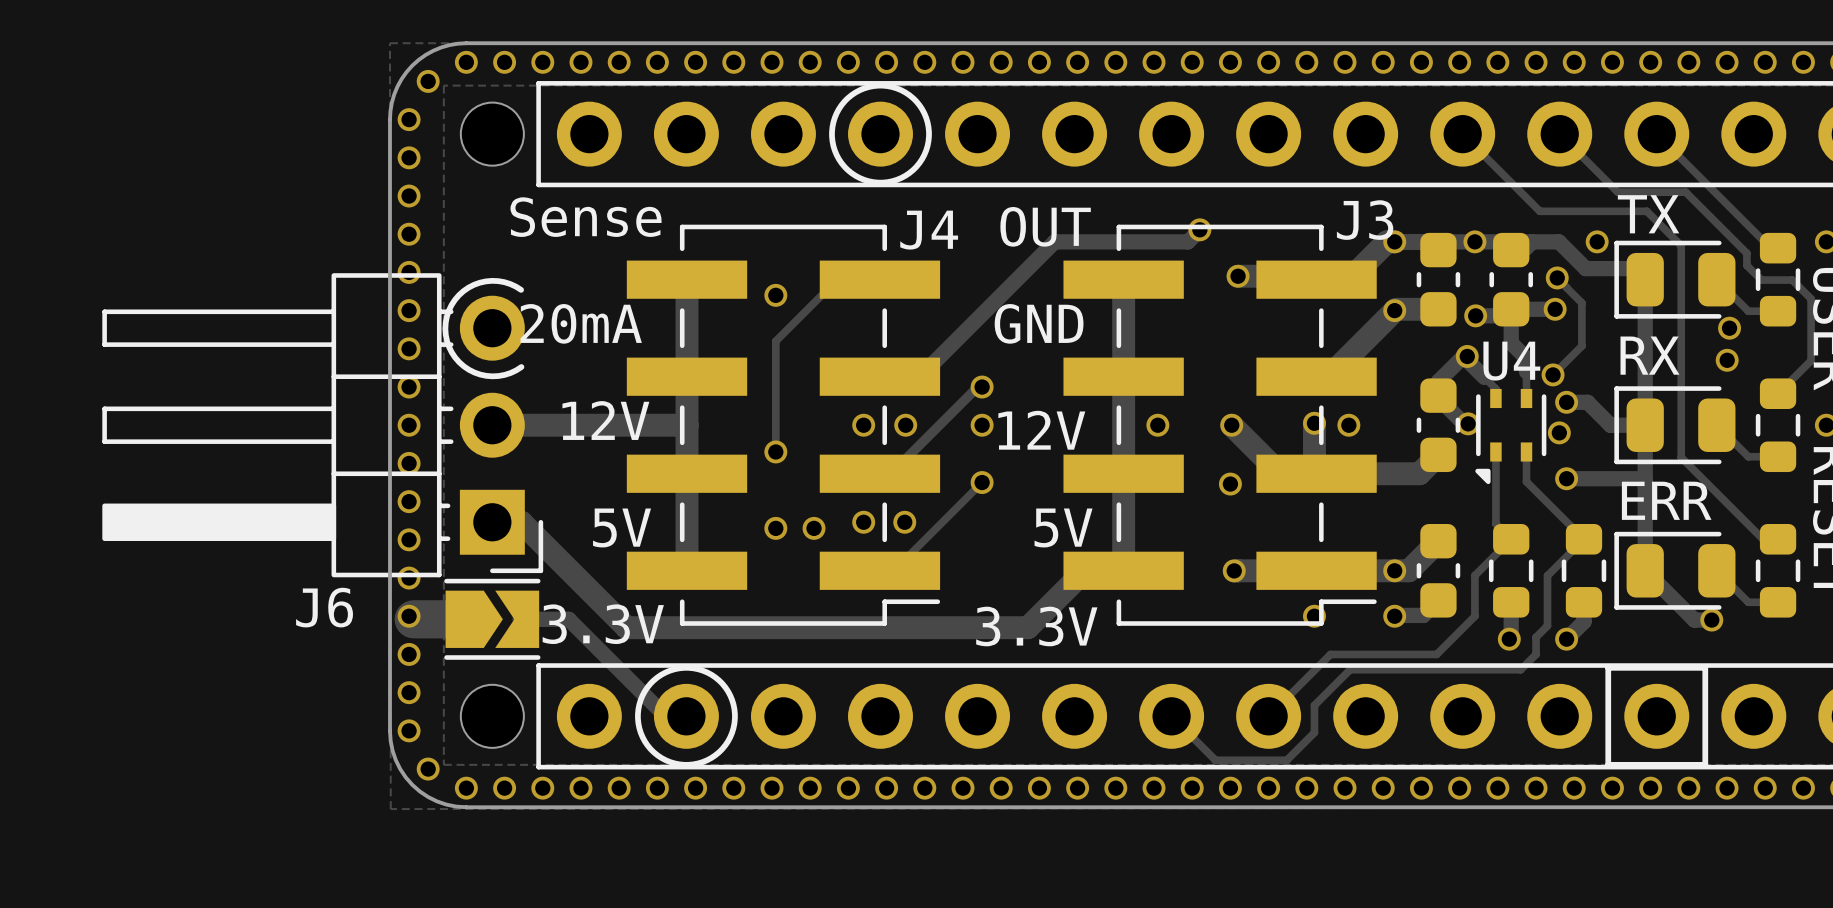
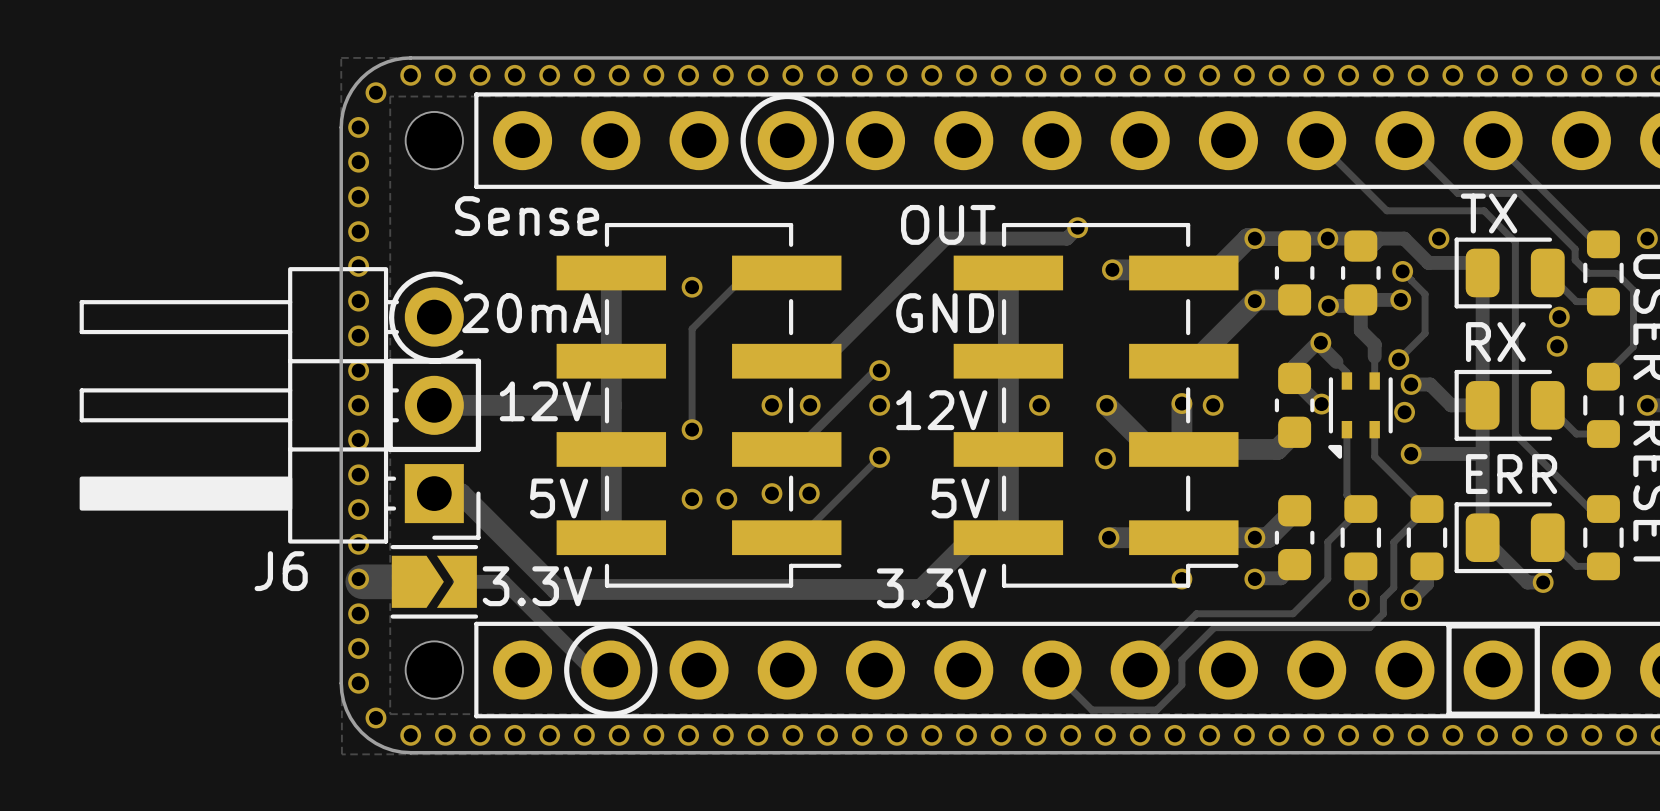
J3 name: J3 (1365, 220) -> none
J4 name: J4 (929, 230) -> none
U4 name: U4 (1511, 361) -> none
line: none -> (478, 361) (390, 361) (390, 449) (478, 449) (478, 361)

